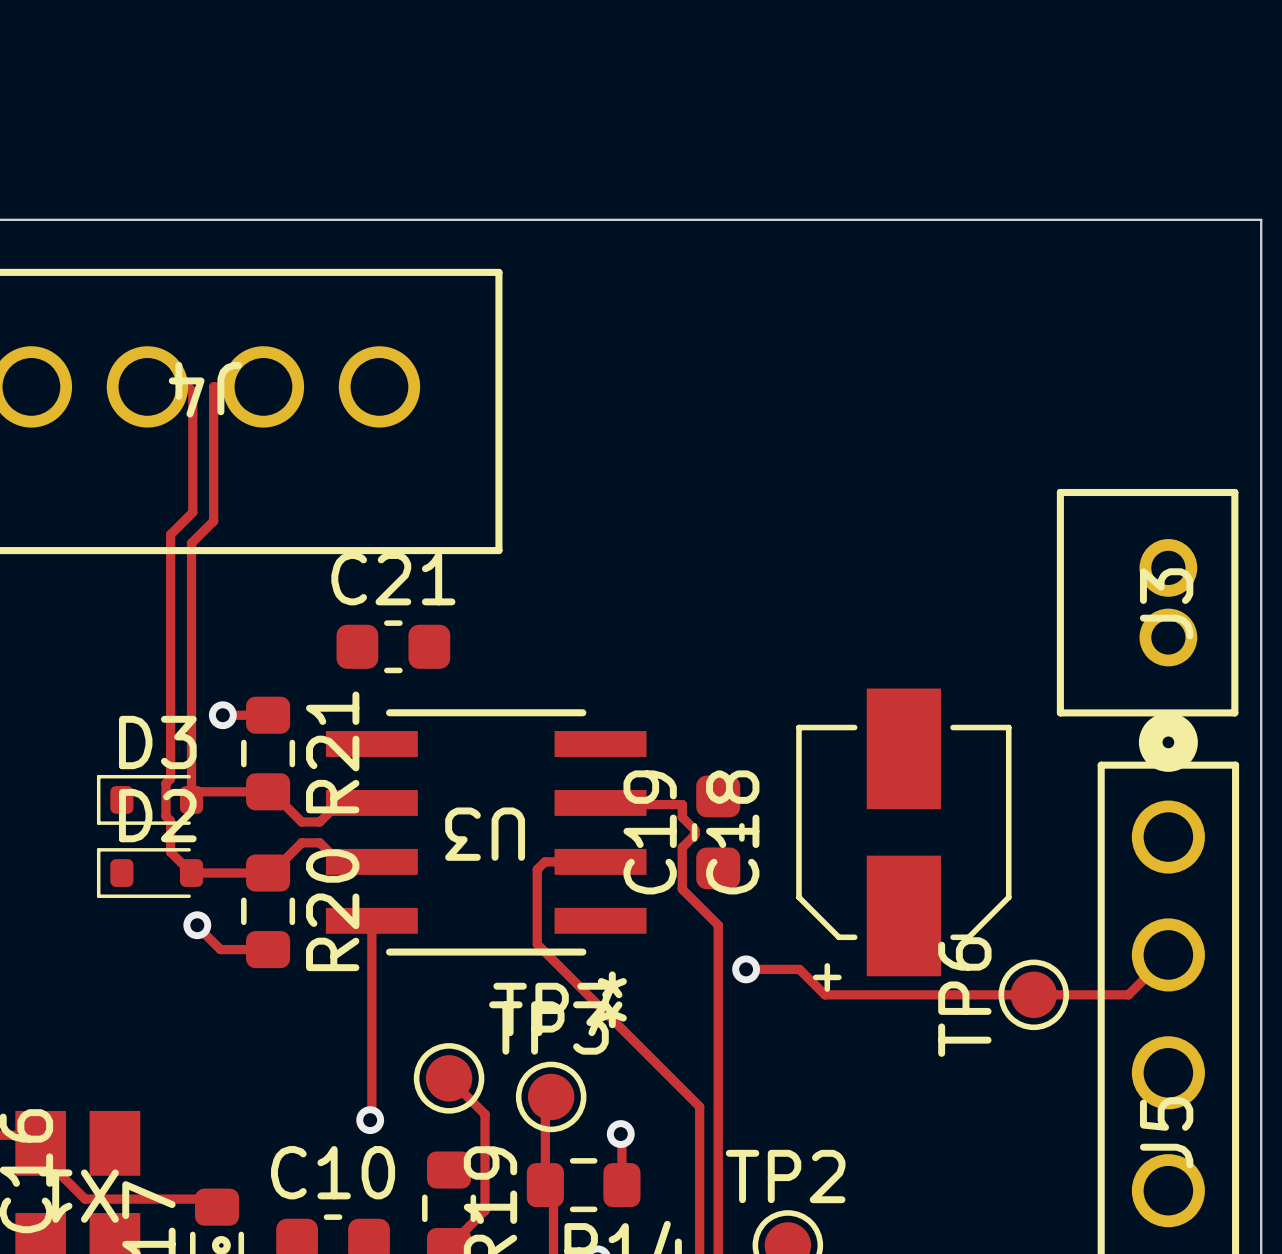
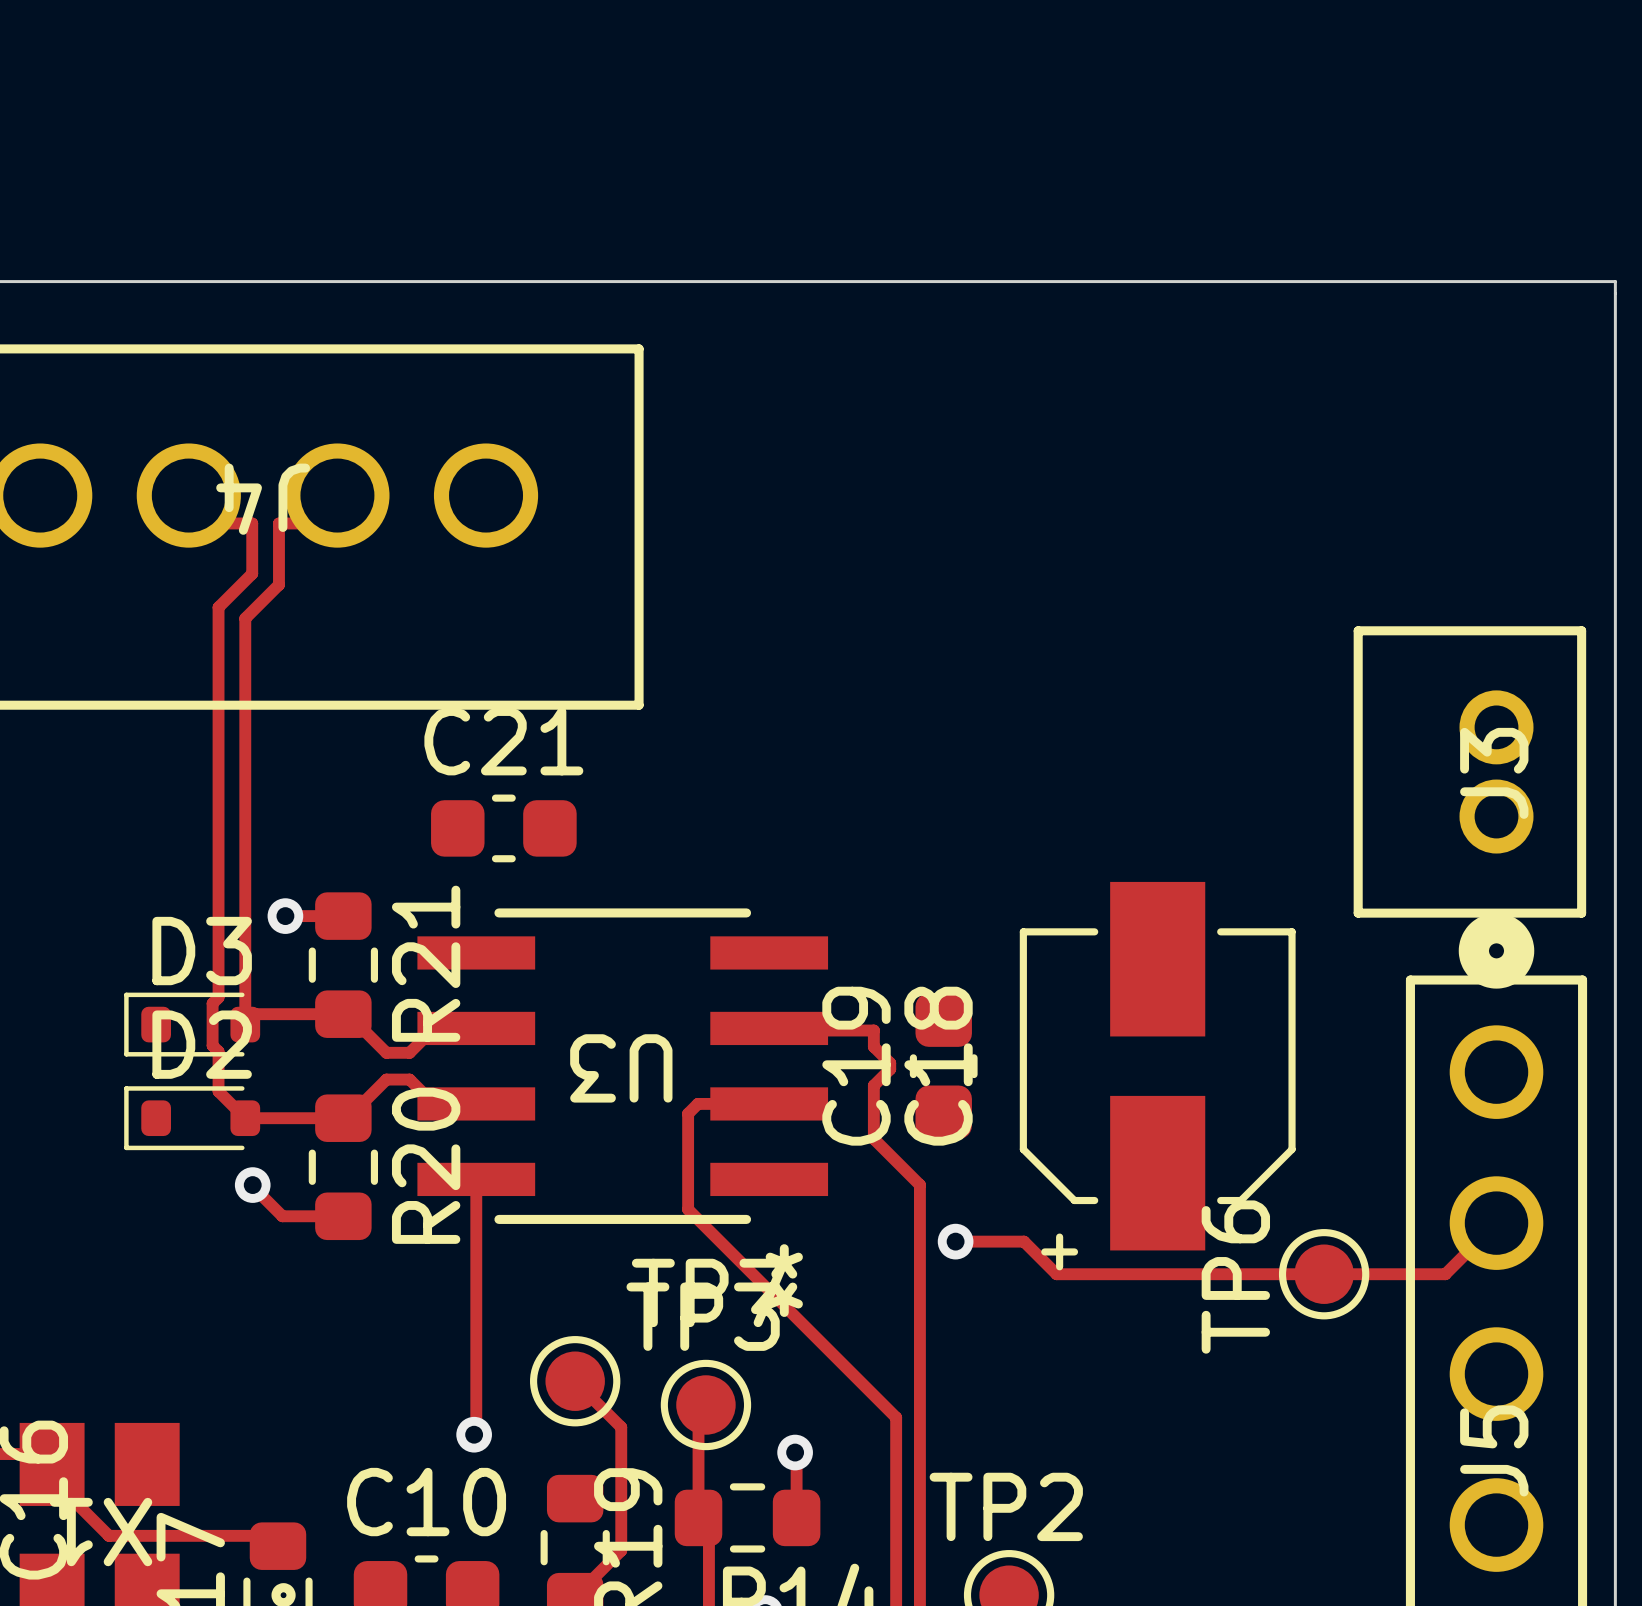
track: (147, 386) (188, 386) (192, 391) (192, 512) (170, 534) -> (188, 495) (216, 523) (252, 523) (252, 573) (218, 607) (218, 684)
track: (263, 386) (213, 386) (213, 521) (191, 543) -> (337, 495) (309, 523) (278, 523) (278, 584) (245, 618) (245, 695)
C19 position: (718, 832) -> (943, 1066)

